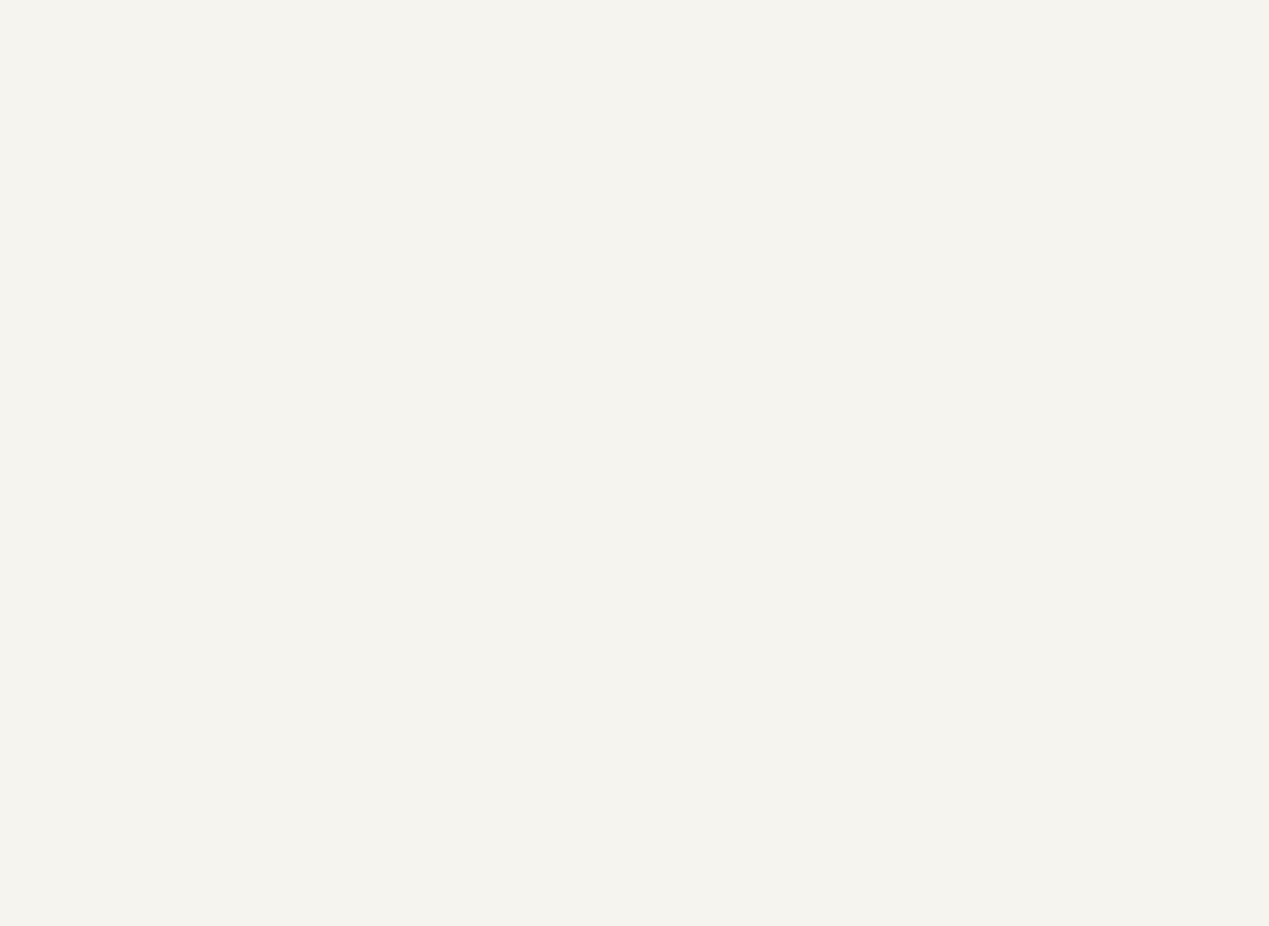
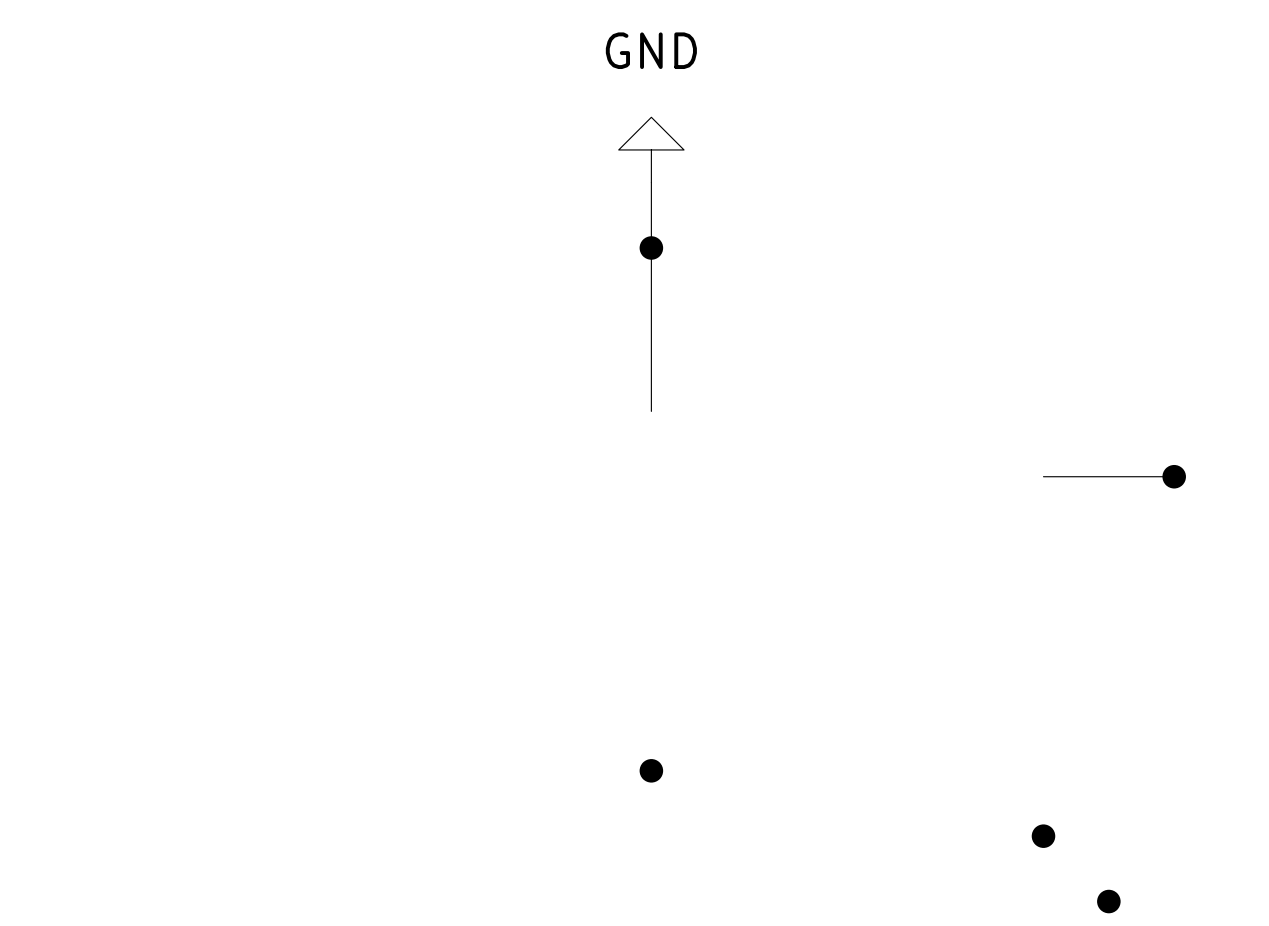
power symbol: none -> GND (651, 149)
wire: none -> (651, 182) (651, 411)
junction: none -> (651, 247)
wire: none -> (1043, 476) (1174, 476)
junction: none -> (1174, 476)
junction: none -> (651, 770)
junction: none -> (1043, 836)
junction: none -> (1108, 901)

